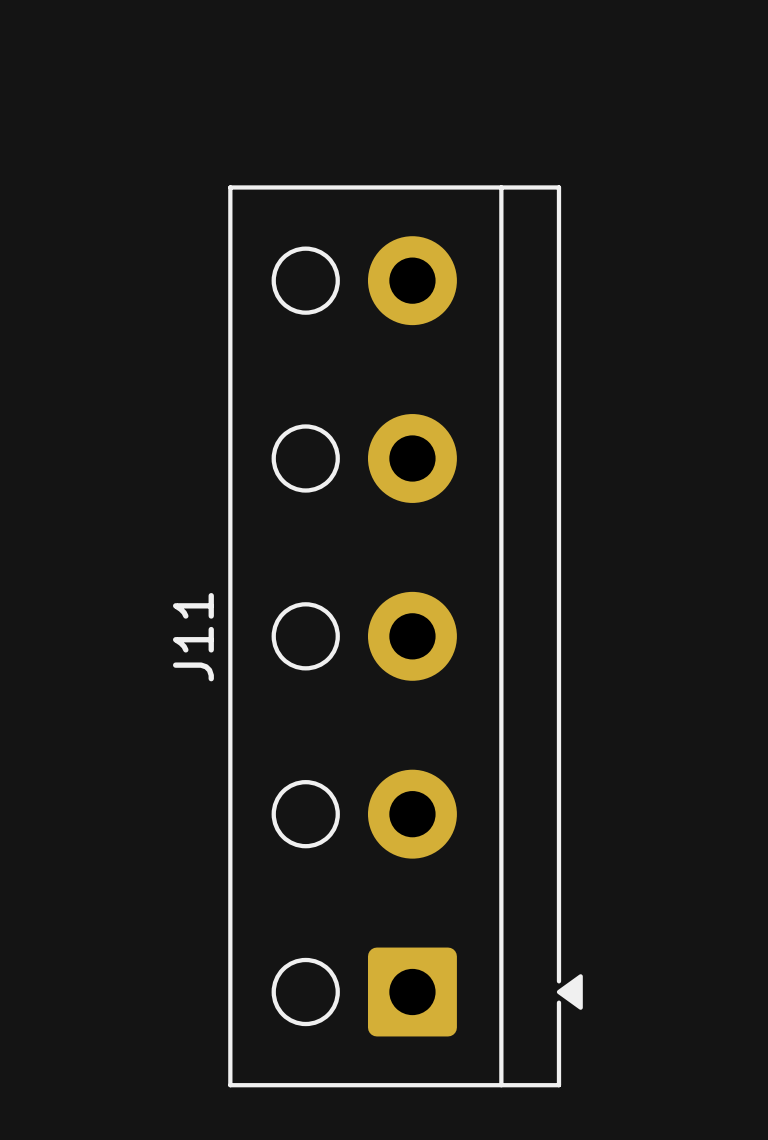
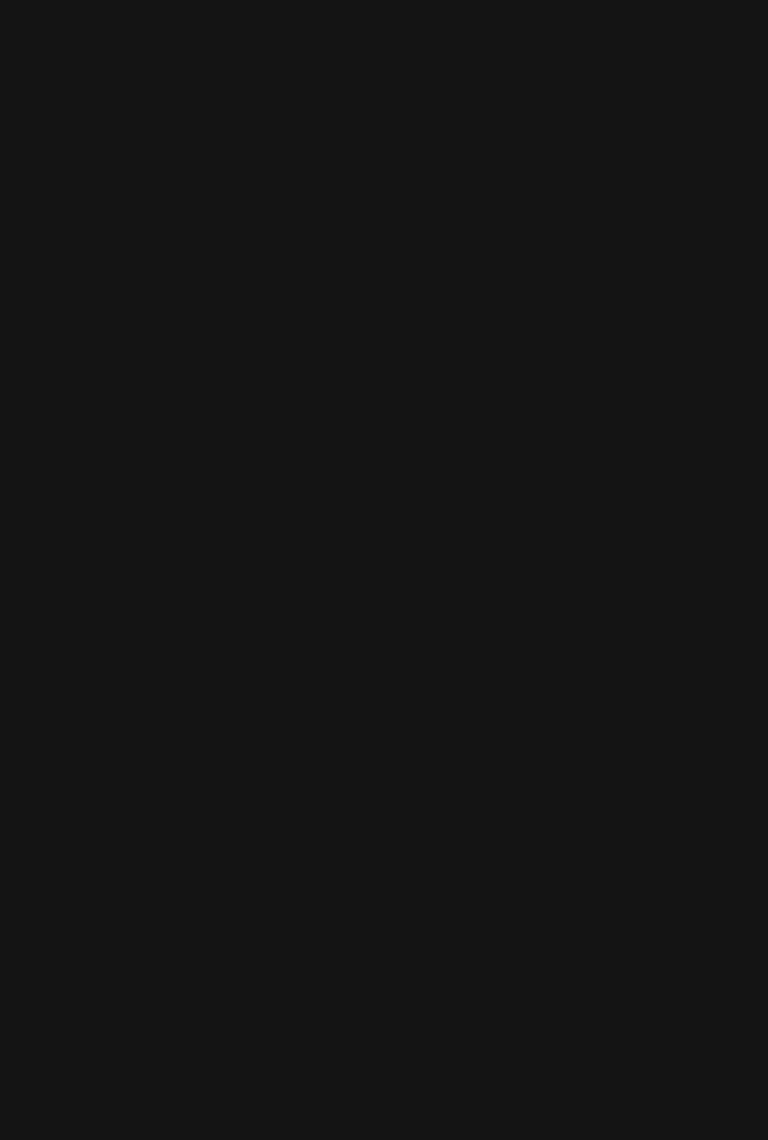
J11: (405, 636) -> none

